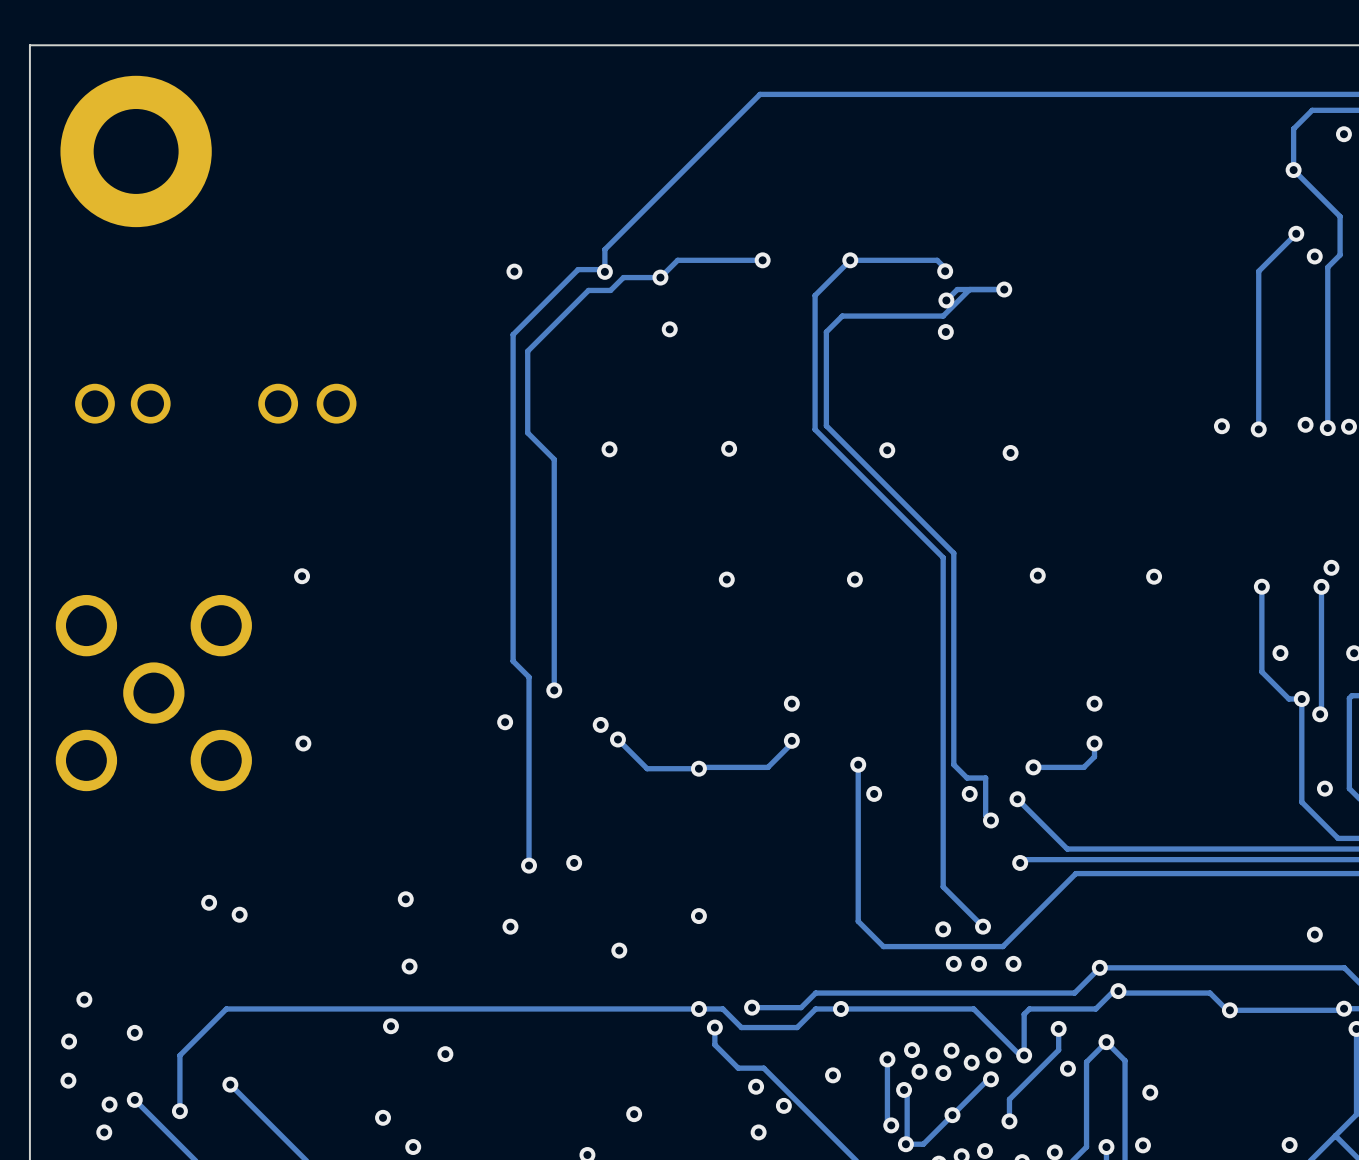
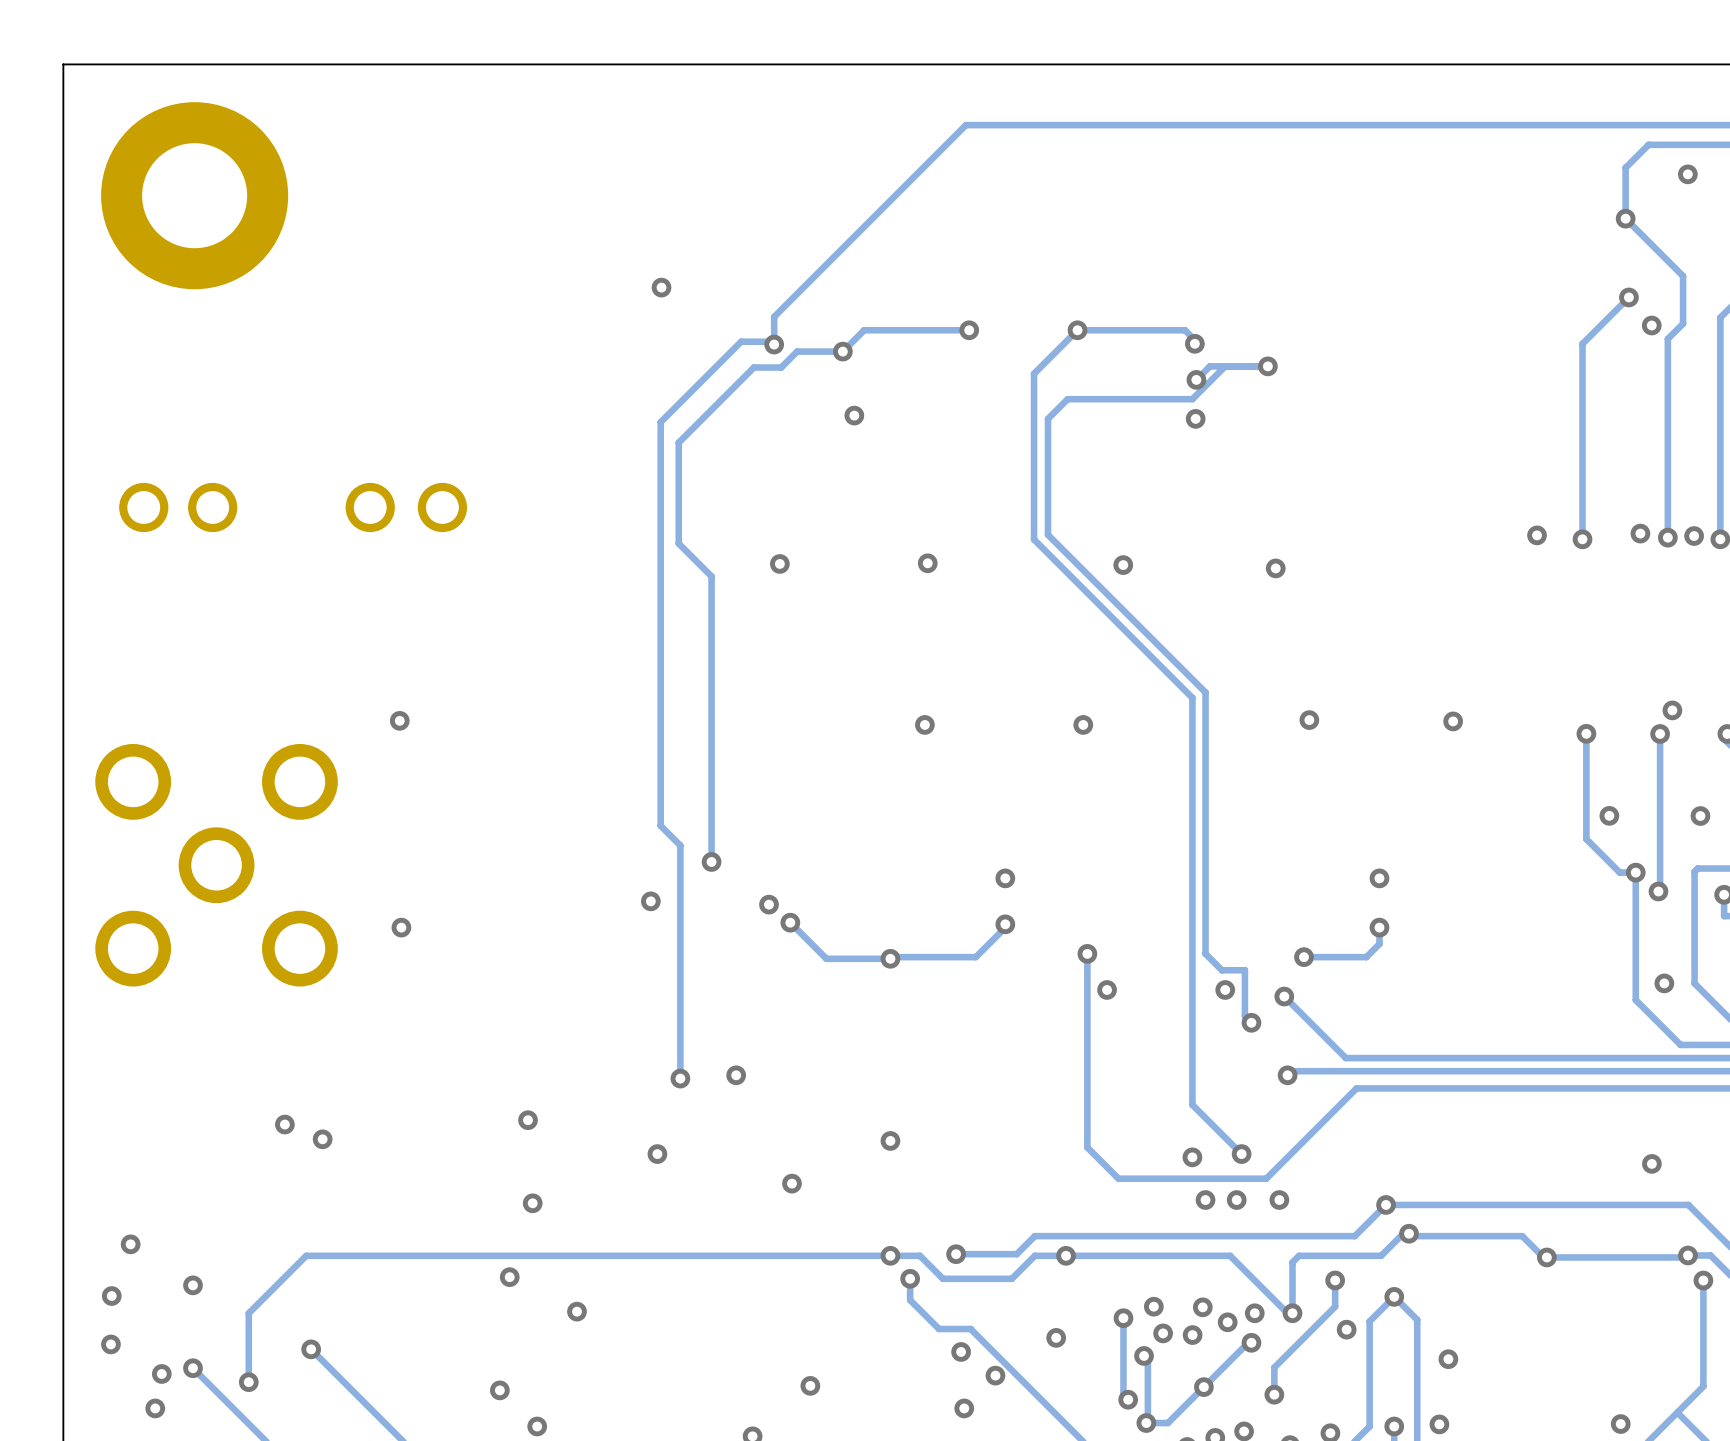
via position: (514, 271) -> (661, 287)

